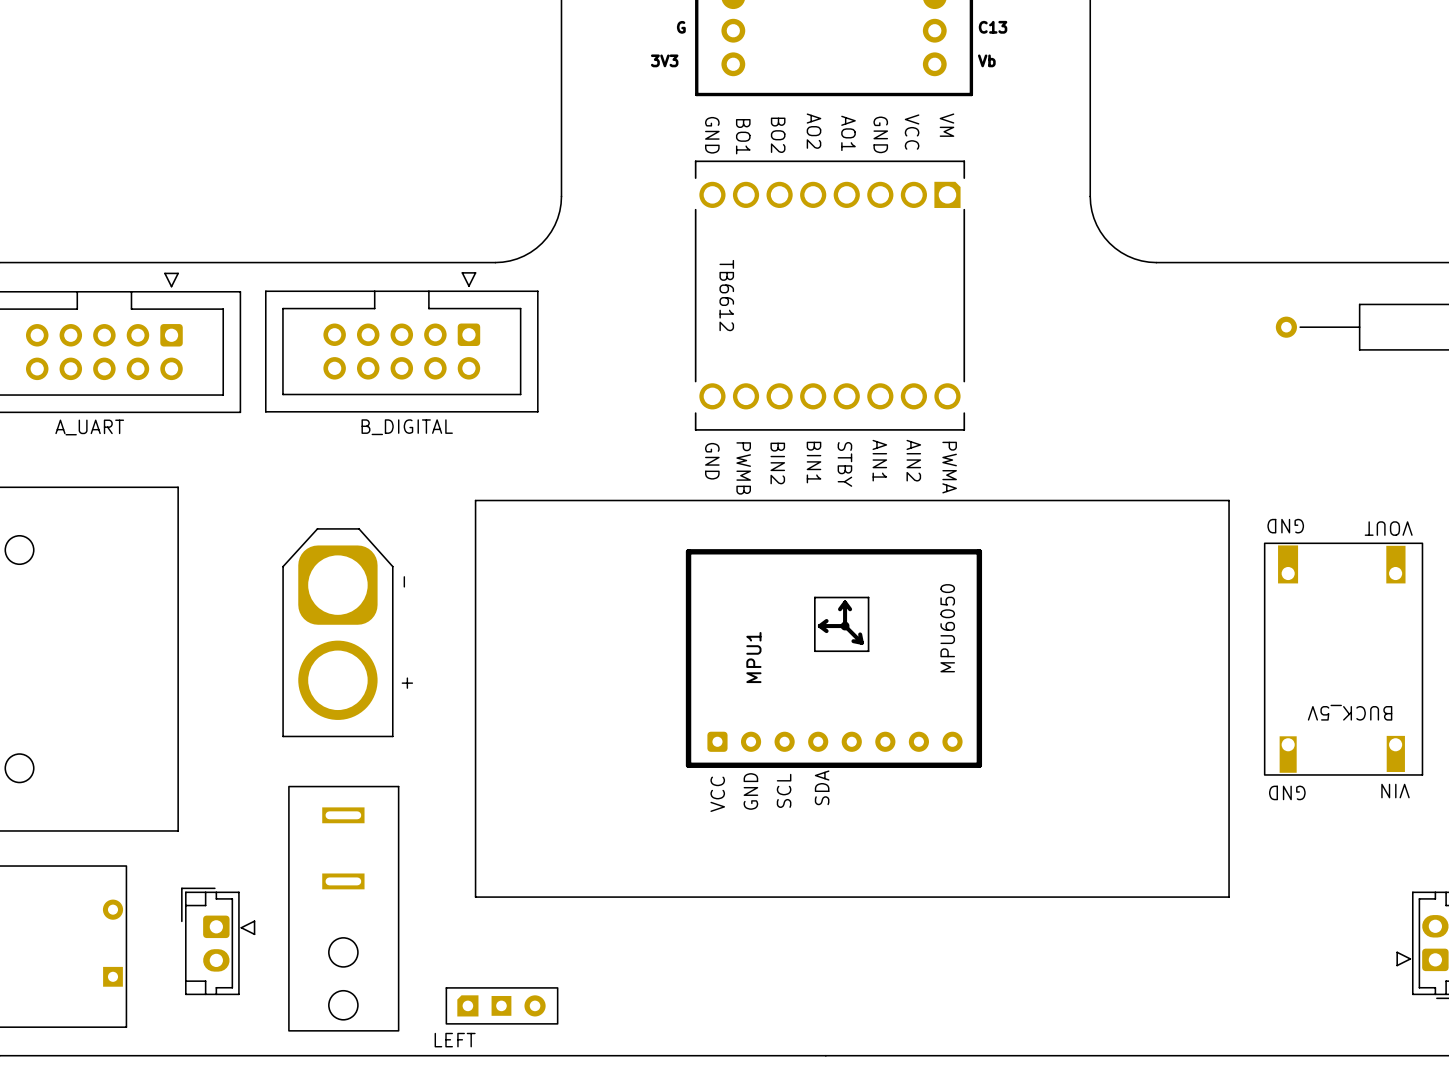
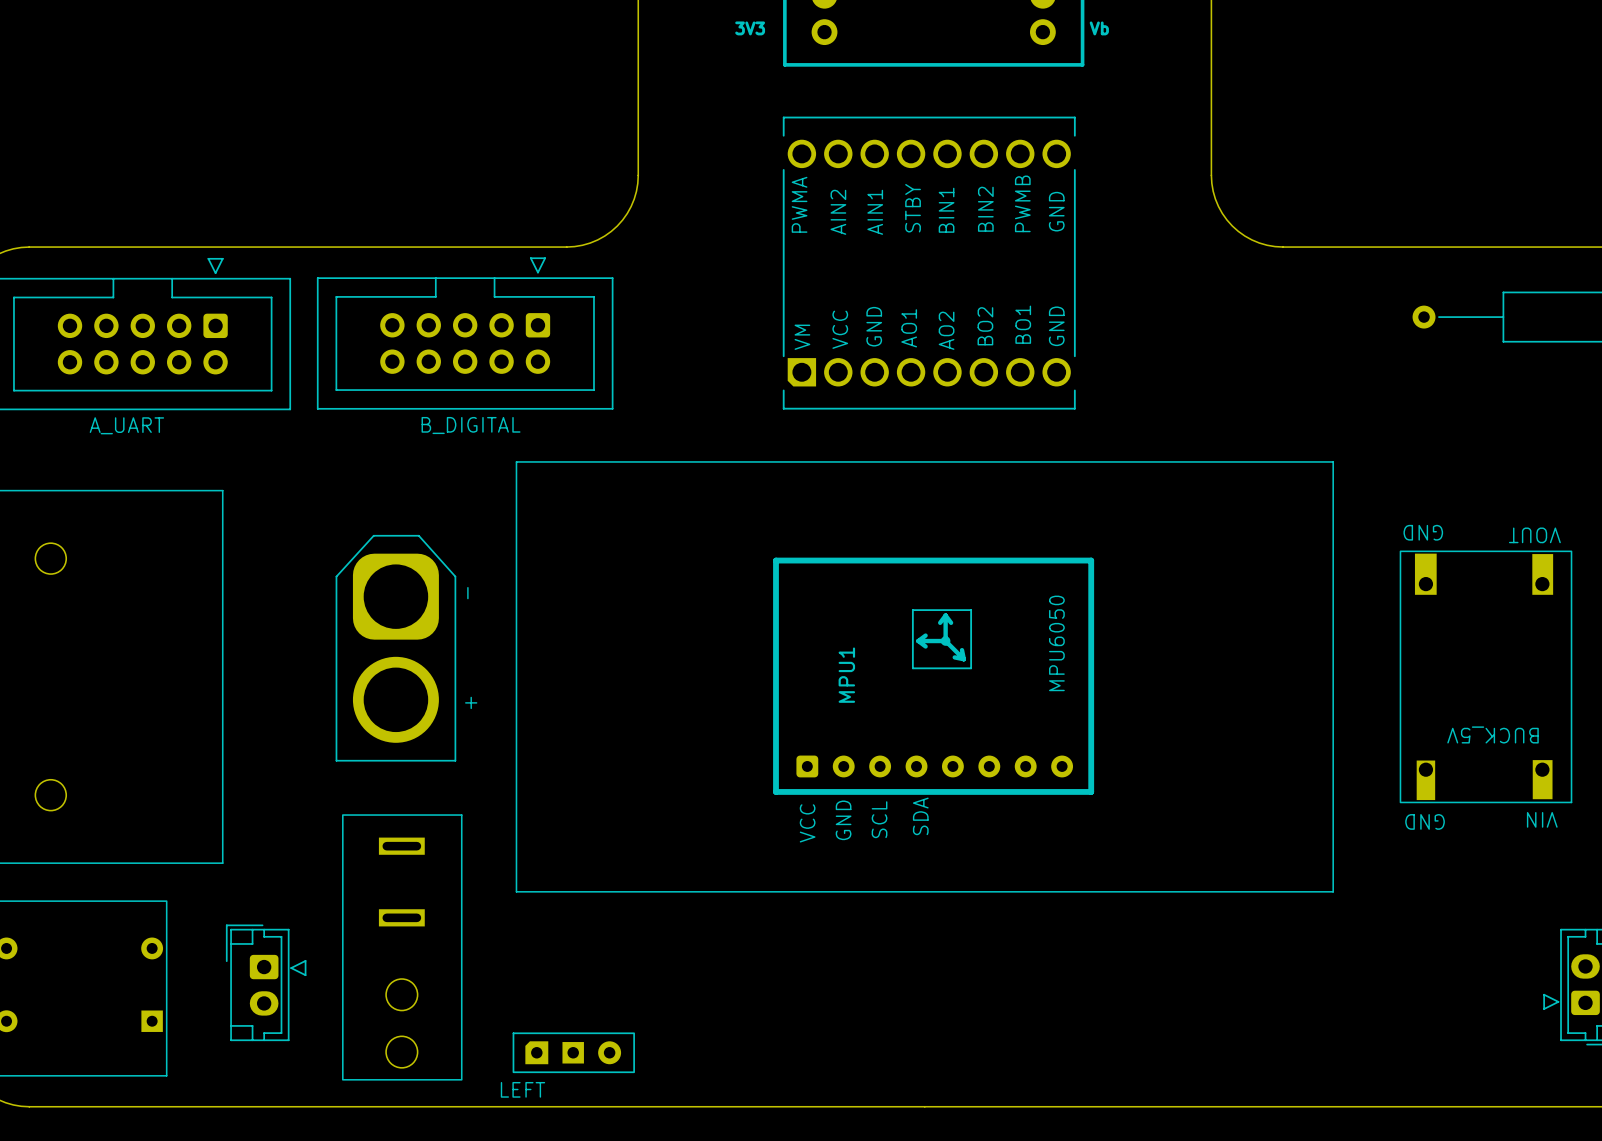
part: none -> (929, 263)
part: (829, 295) -> none
line: (475, 500) (1229, 500) (1229, 897) (475, 897) (475, 500) -> (516, 461) (516, 891) (1333, 891) (1333, 461) (516, 461)

